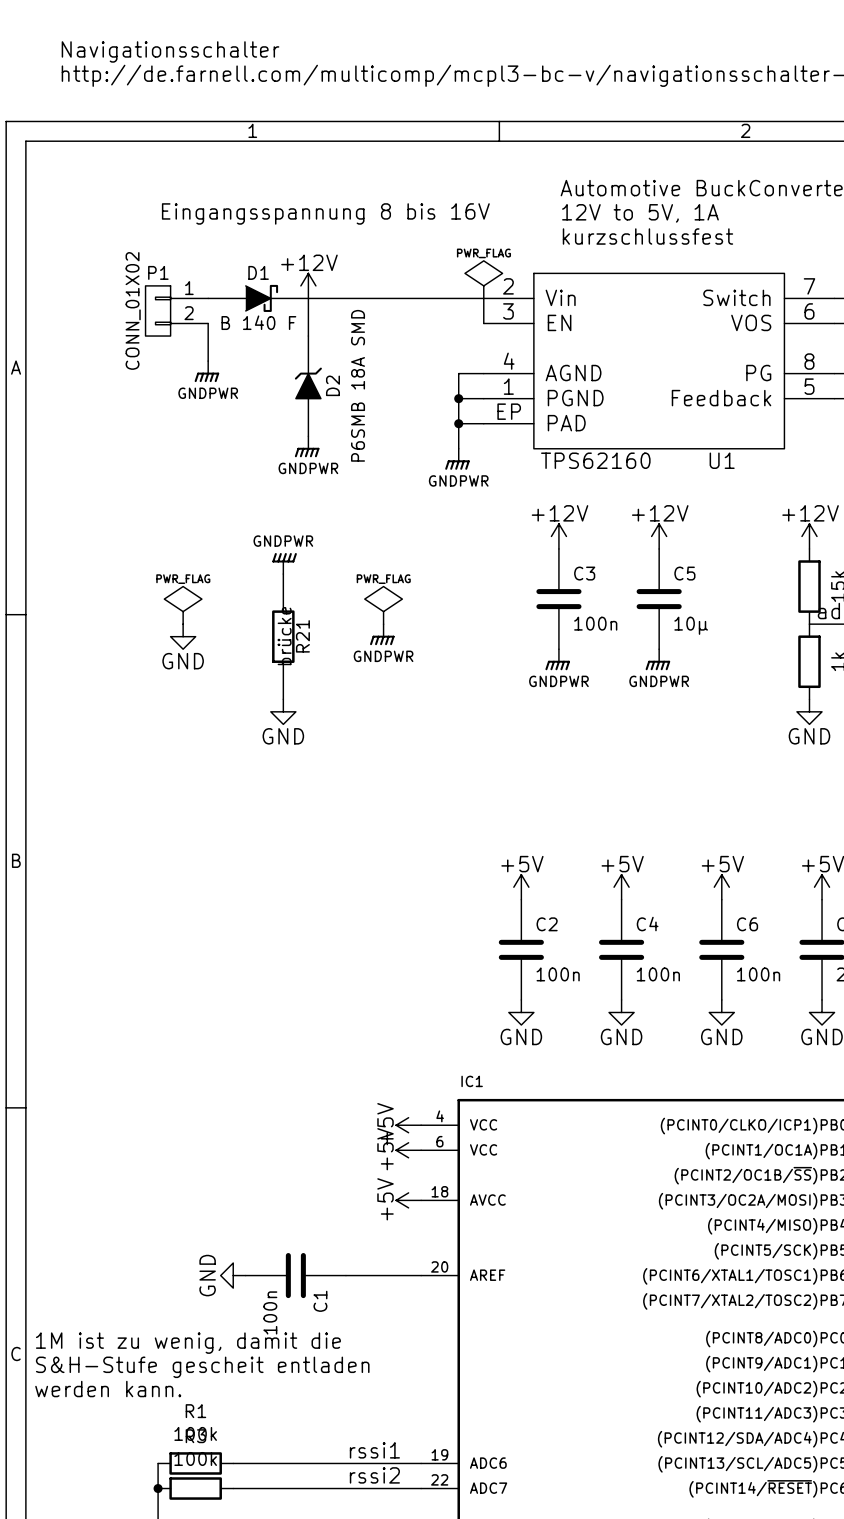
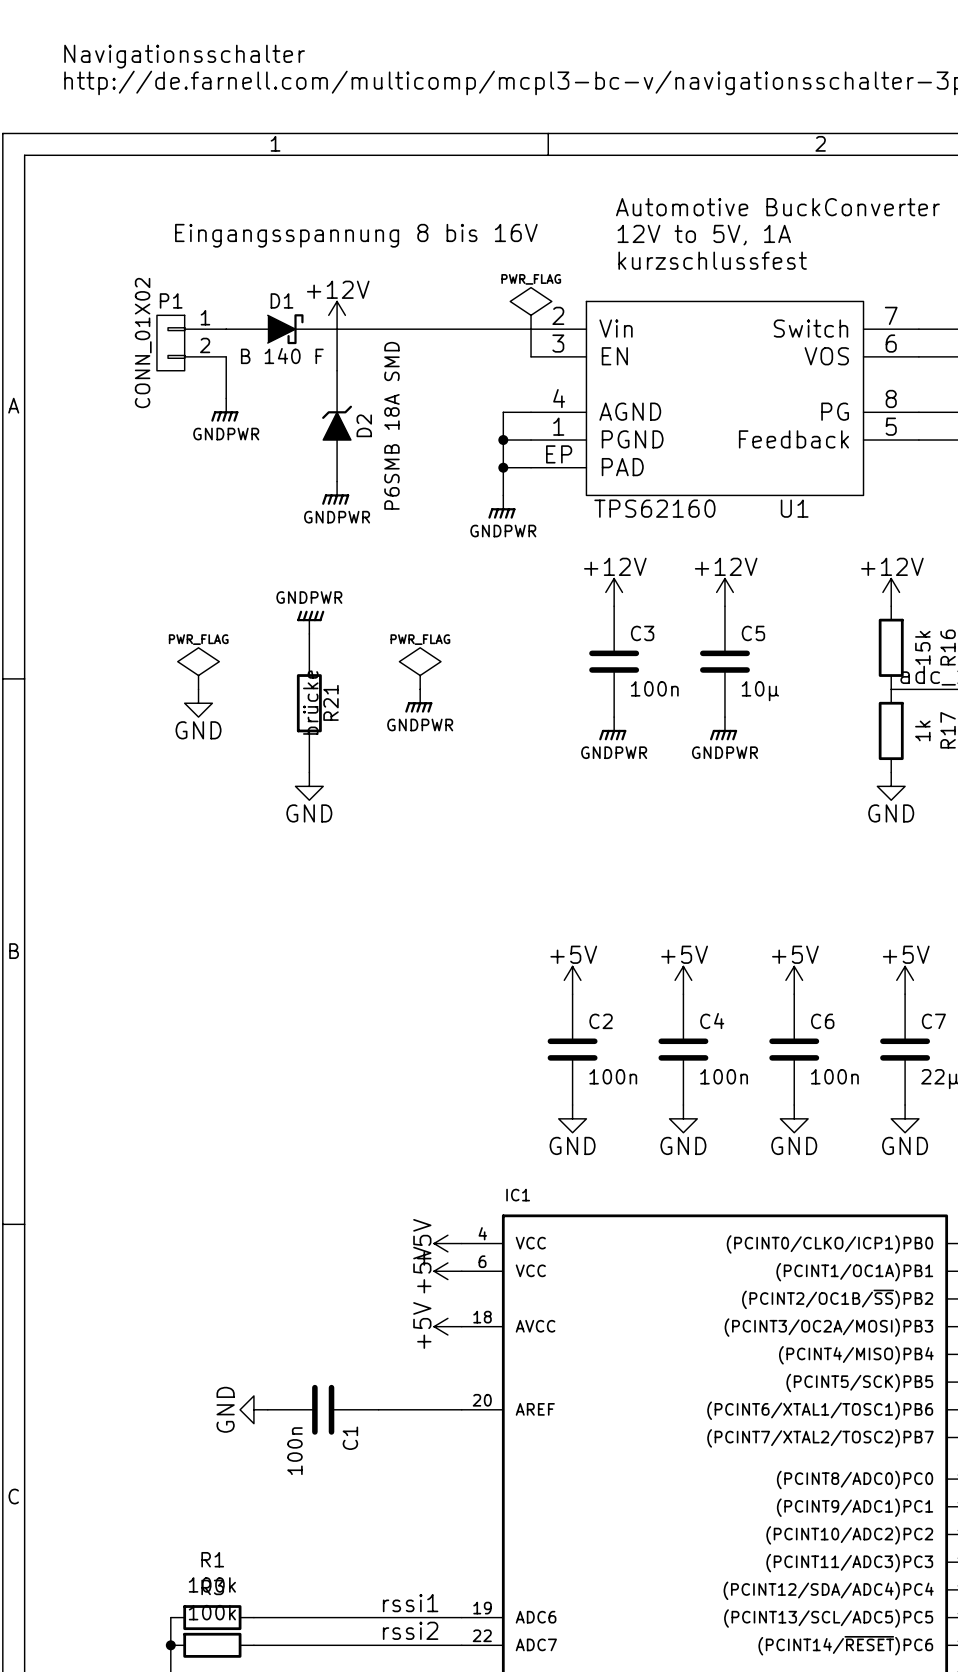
text: 1M ist zu wenig, damit die (188, 1343) -> none
text: S&H-Stufe gescheit entladen (202, 1367) -> none
text: werden kann. (108, 1389) -> none

